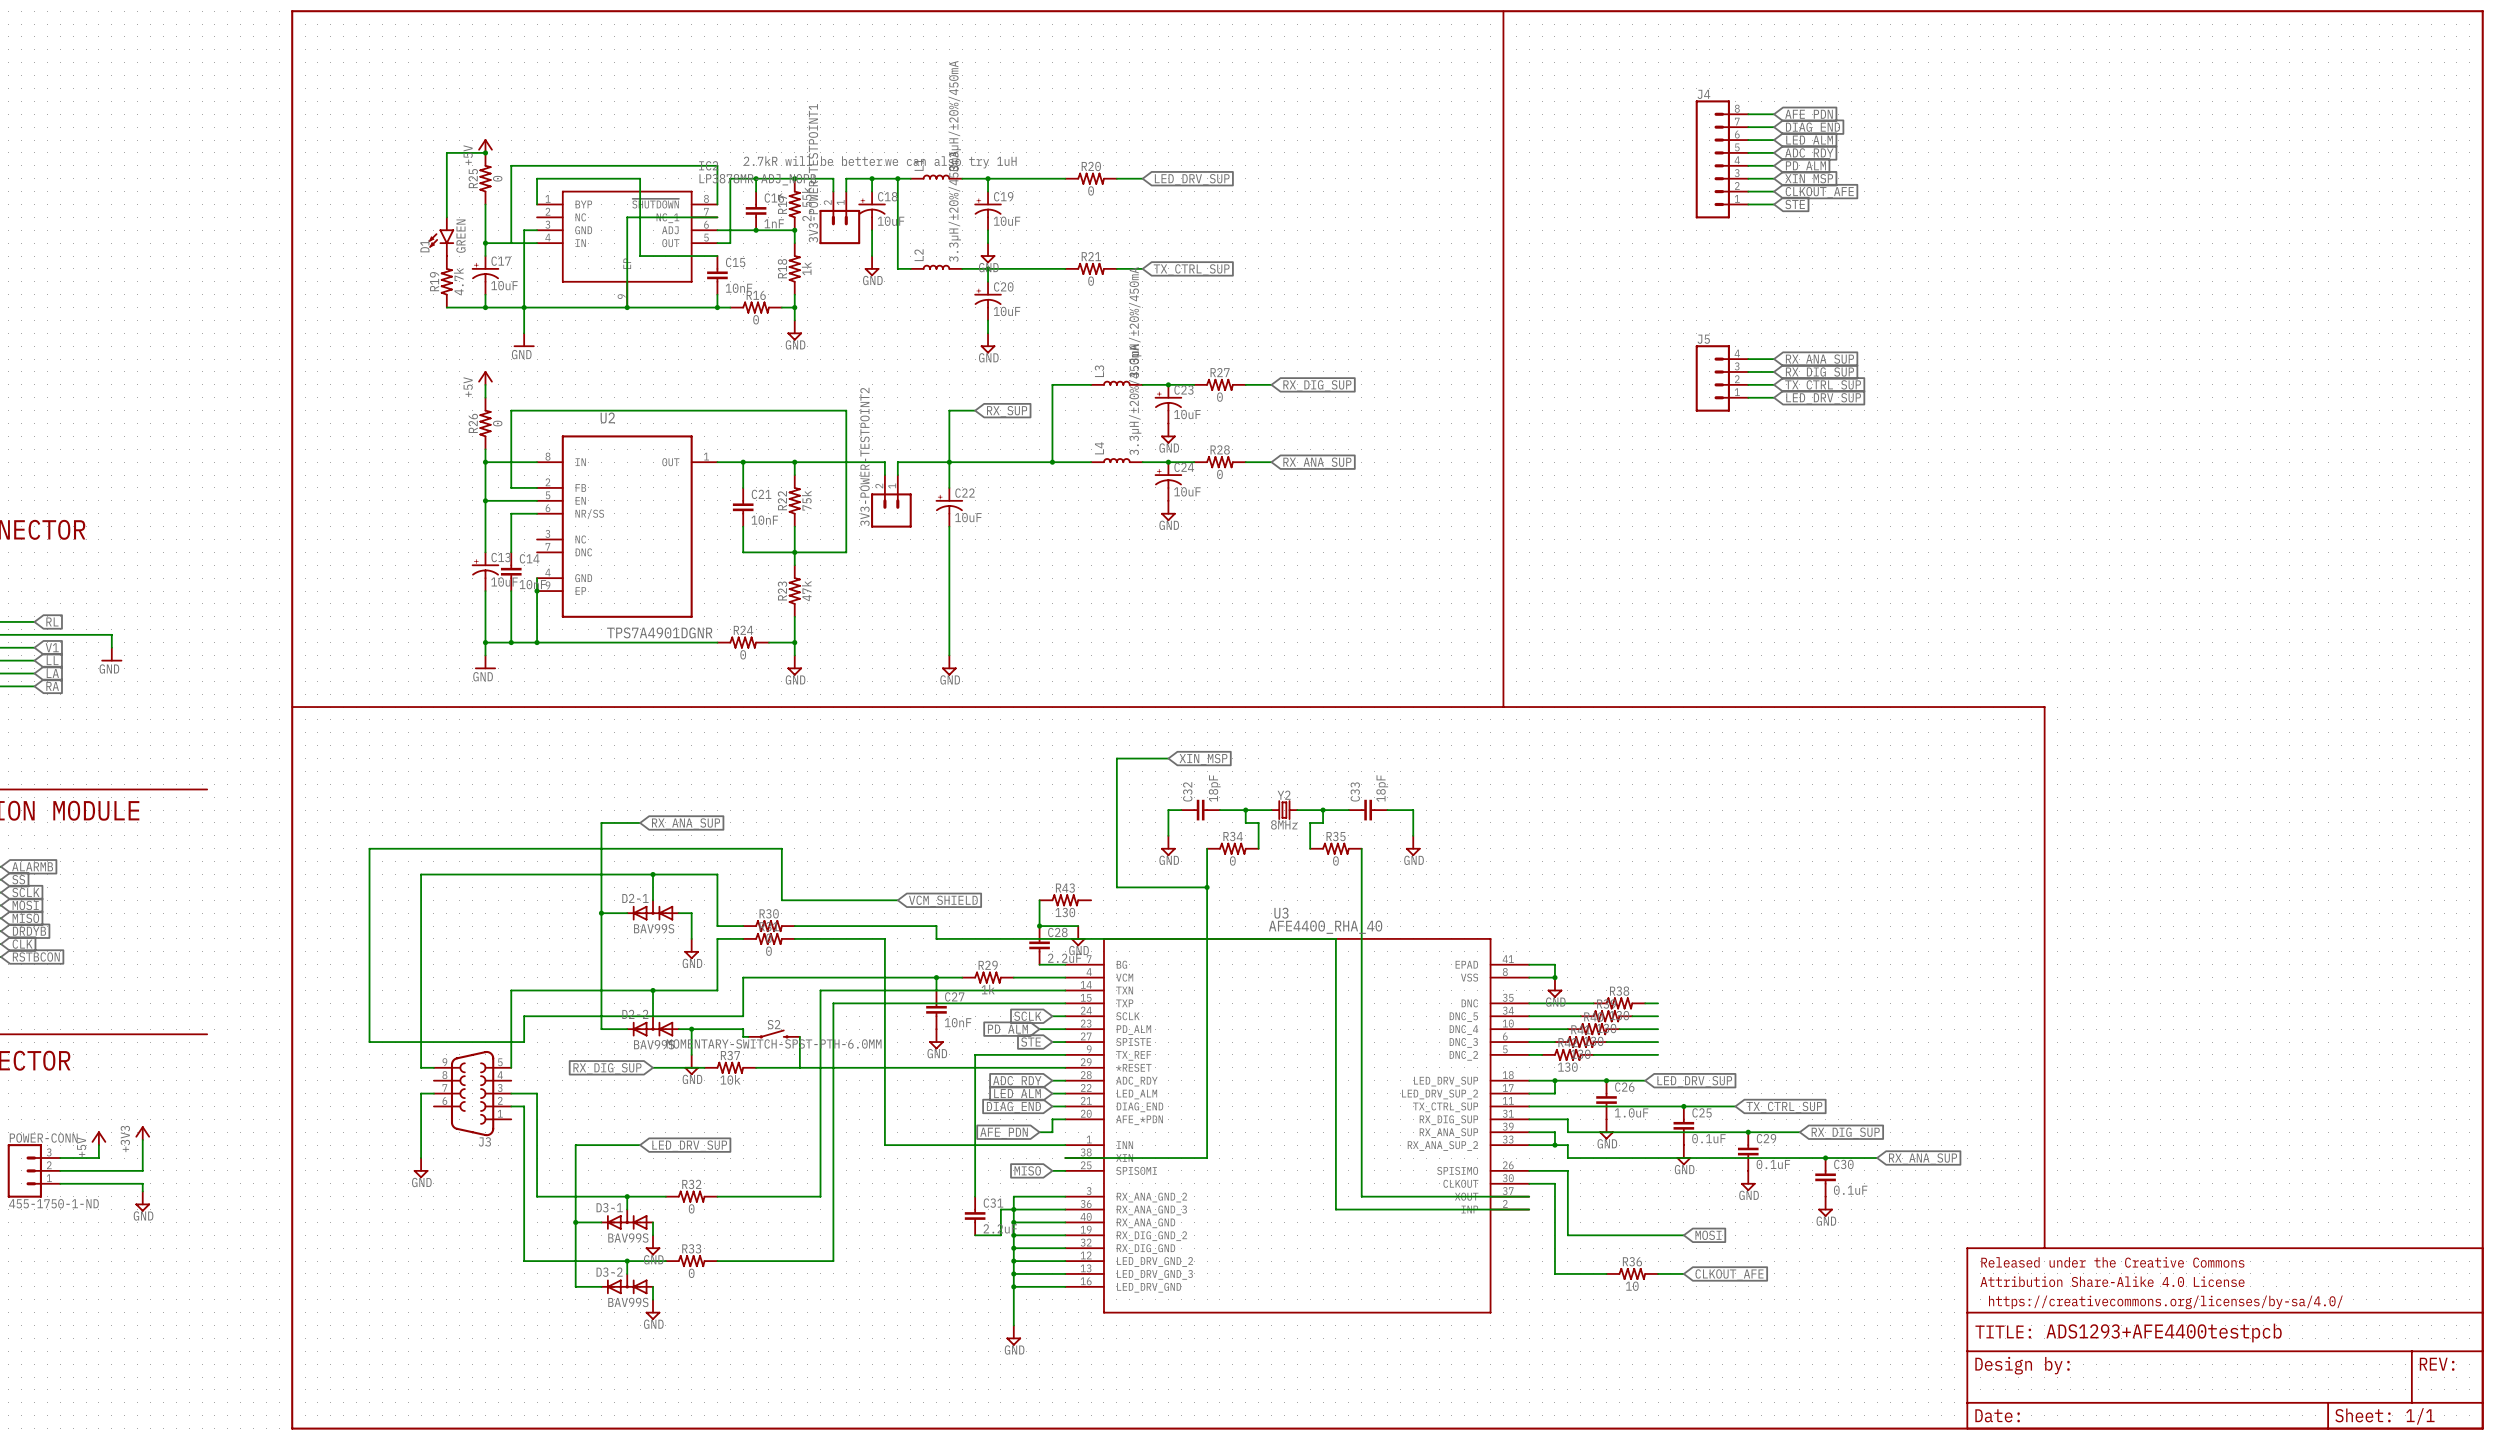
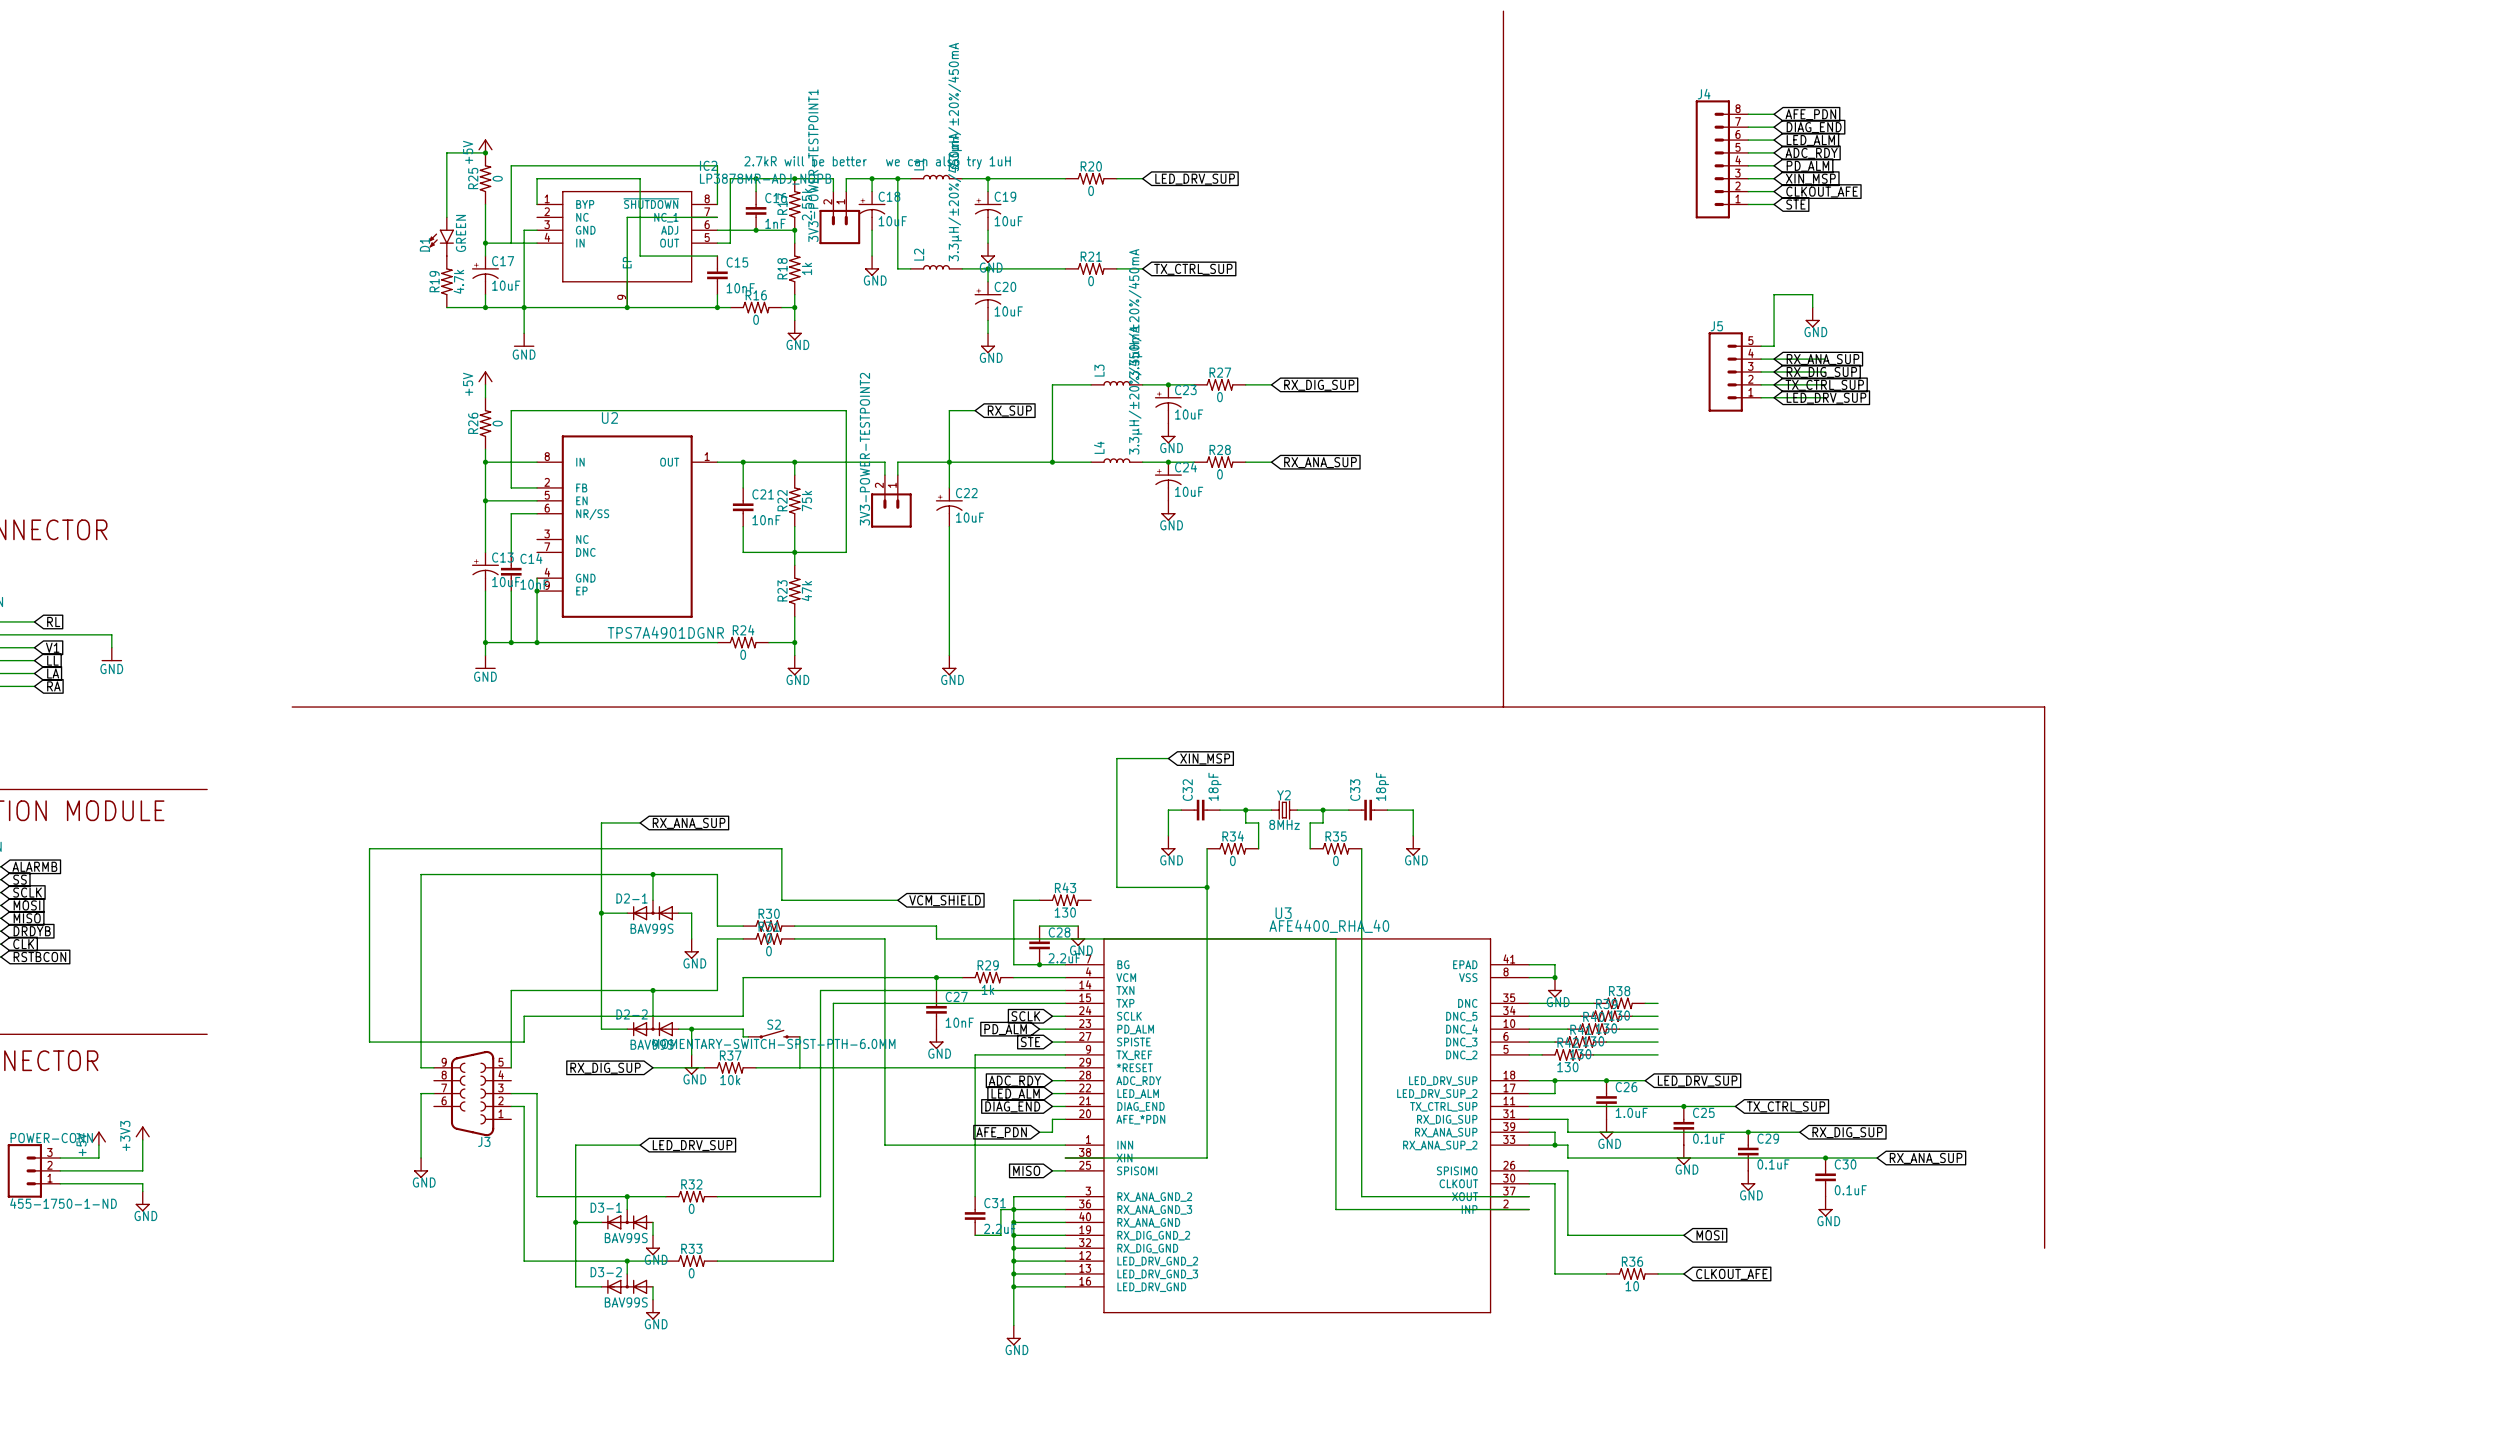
wire: none -> (1812, 307) (1812, 294) (1774, 294) (1774, 346) (1761, 346)
power symbol: none -> GND (1812, 317)
J5 symbol: [1695, 345, 1749, 412] -> [1708, 332, 1762, 412]
wire: none -> (1774, 359) (1825, 359)
wire: none -> (1774, 371) (1825, 371)
wire: none -> (1774, 384) (1825, 384)
wire: none -> (1774, 397) (1825, 397)
part: (1387, 719) -> none
wire: (1039, 900) (1039, 926) -> (1039, 900) (1013, 900) (1013, 964) (1039, 964)
junction: (1039, 926) -> none
junction: none -> (1039, 964)
part: (2225, 1338) -> none

